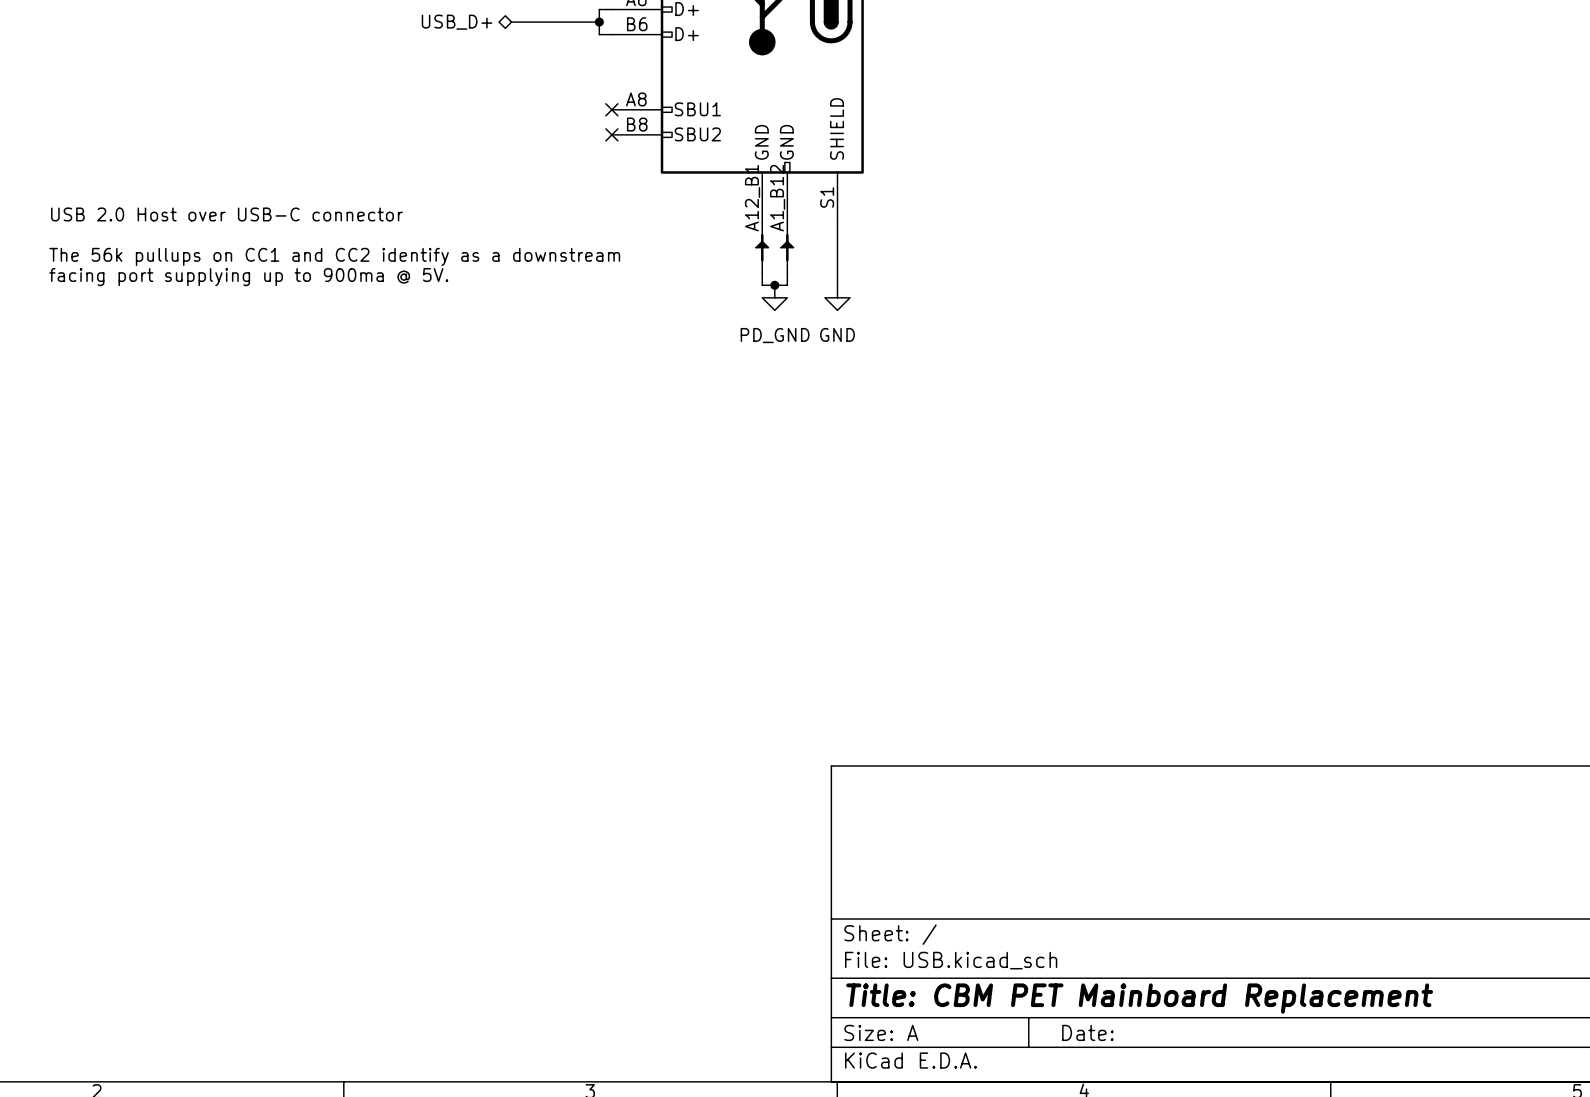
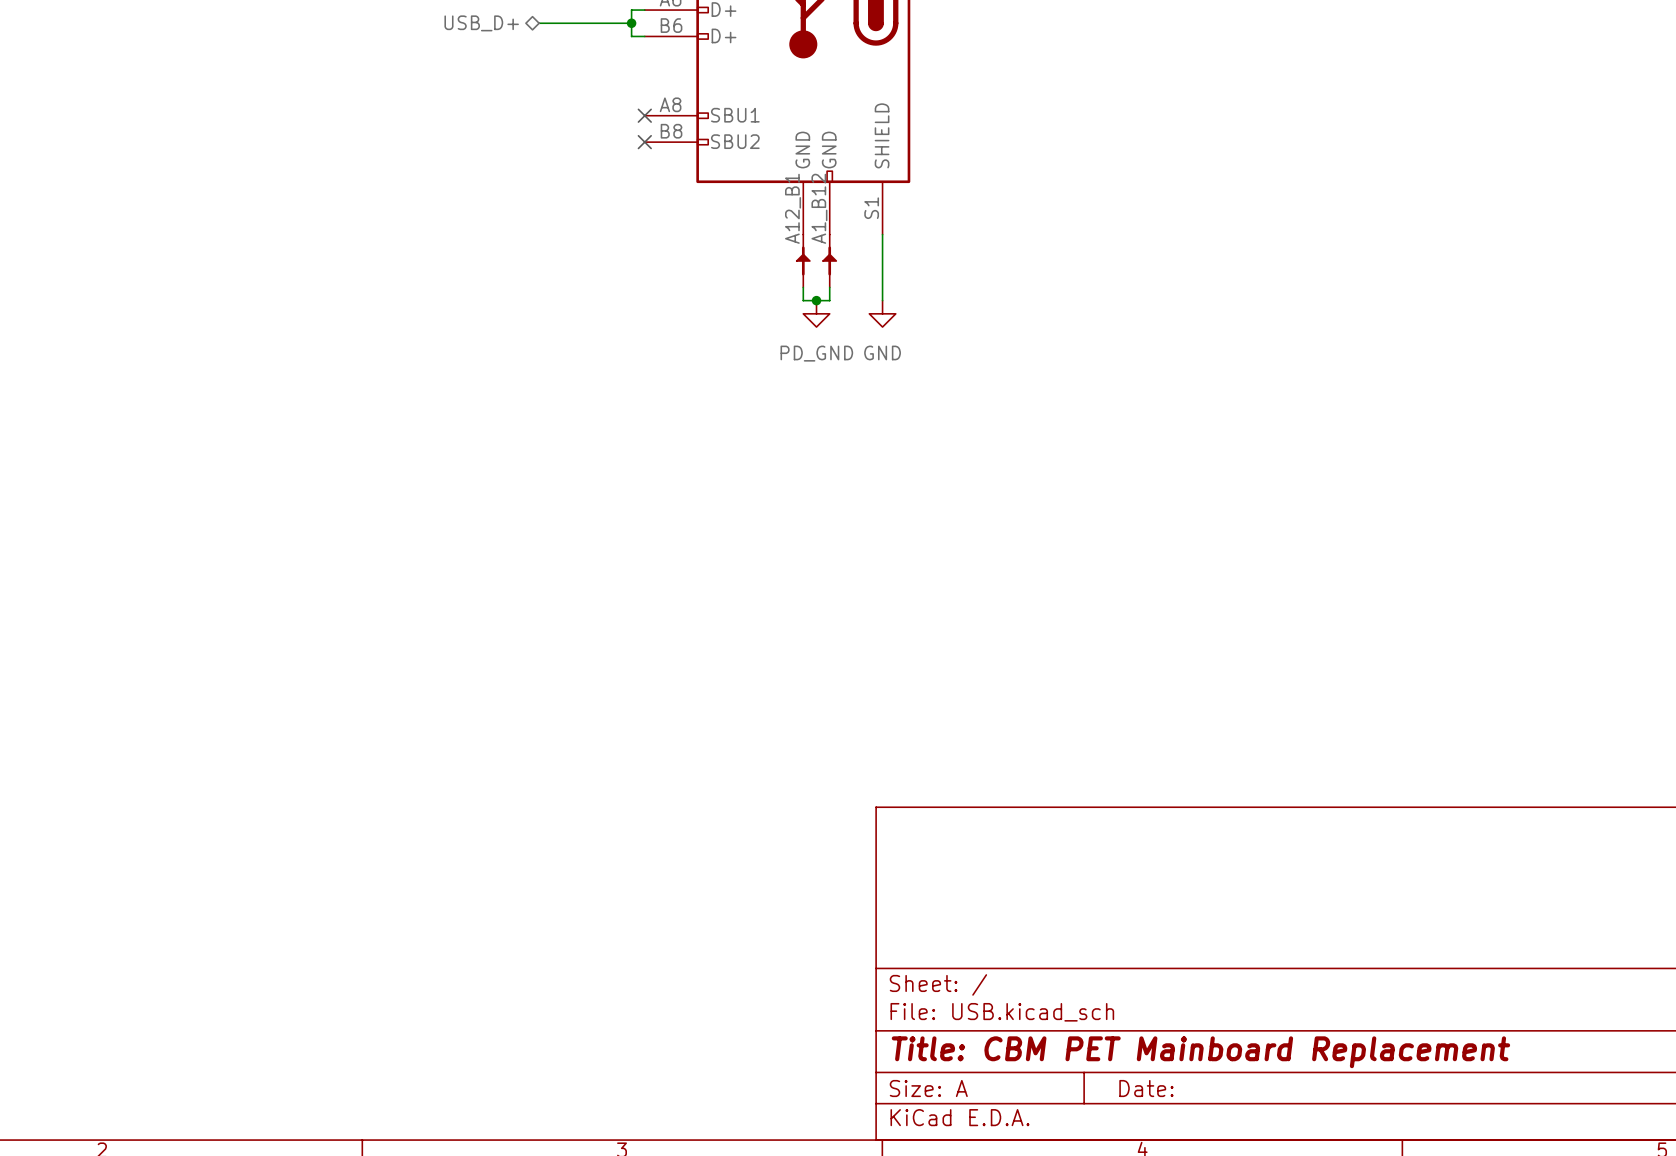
text: USB 2.0 Host over USB-C connector (226, 214) -> none
text: The 56k pullups on CC1 and CC2 identify as a downstream (334, 256) -> none
text: facing port supplying up to 900ma @ 5V. (248, 277) -> none

